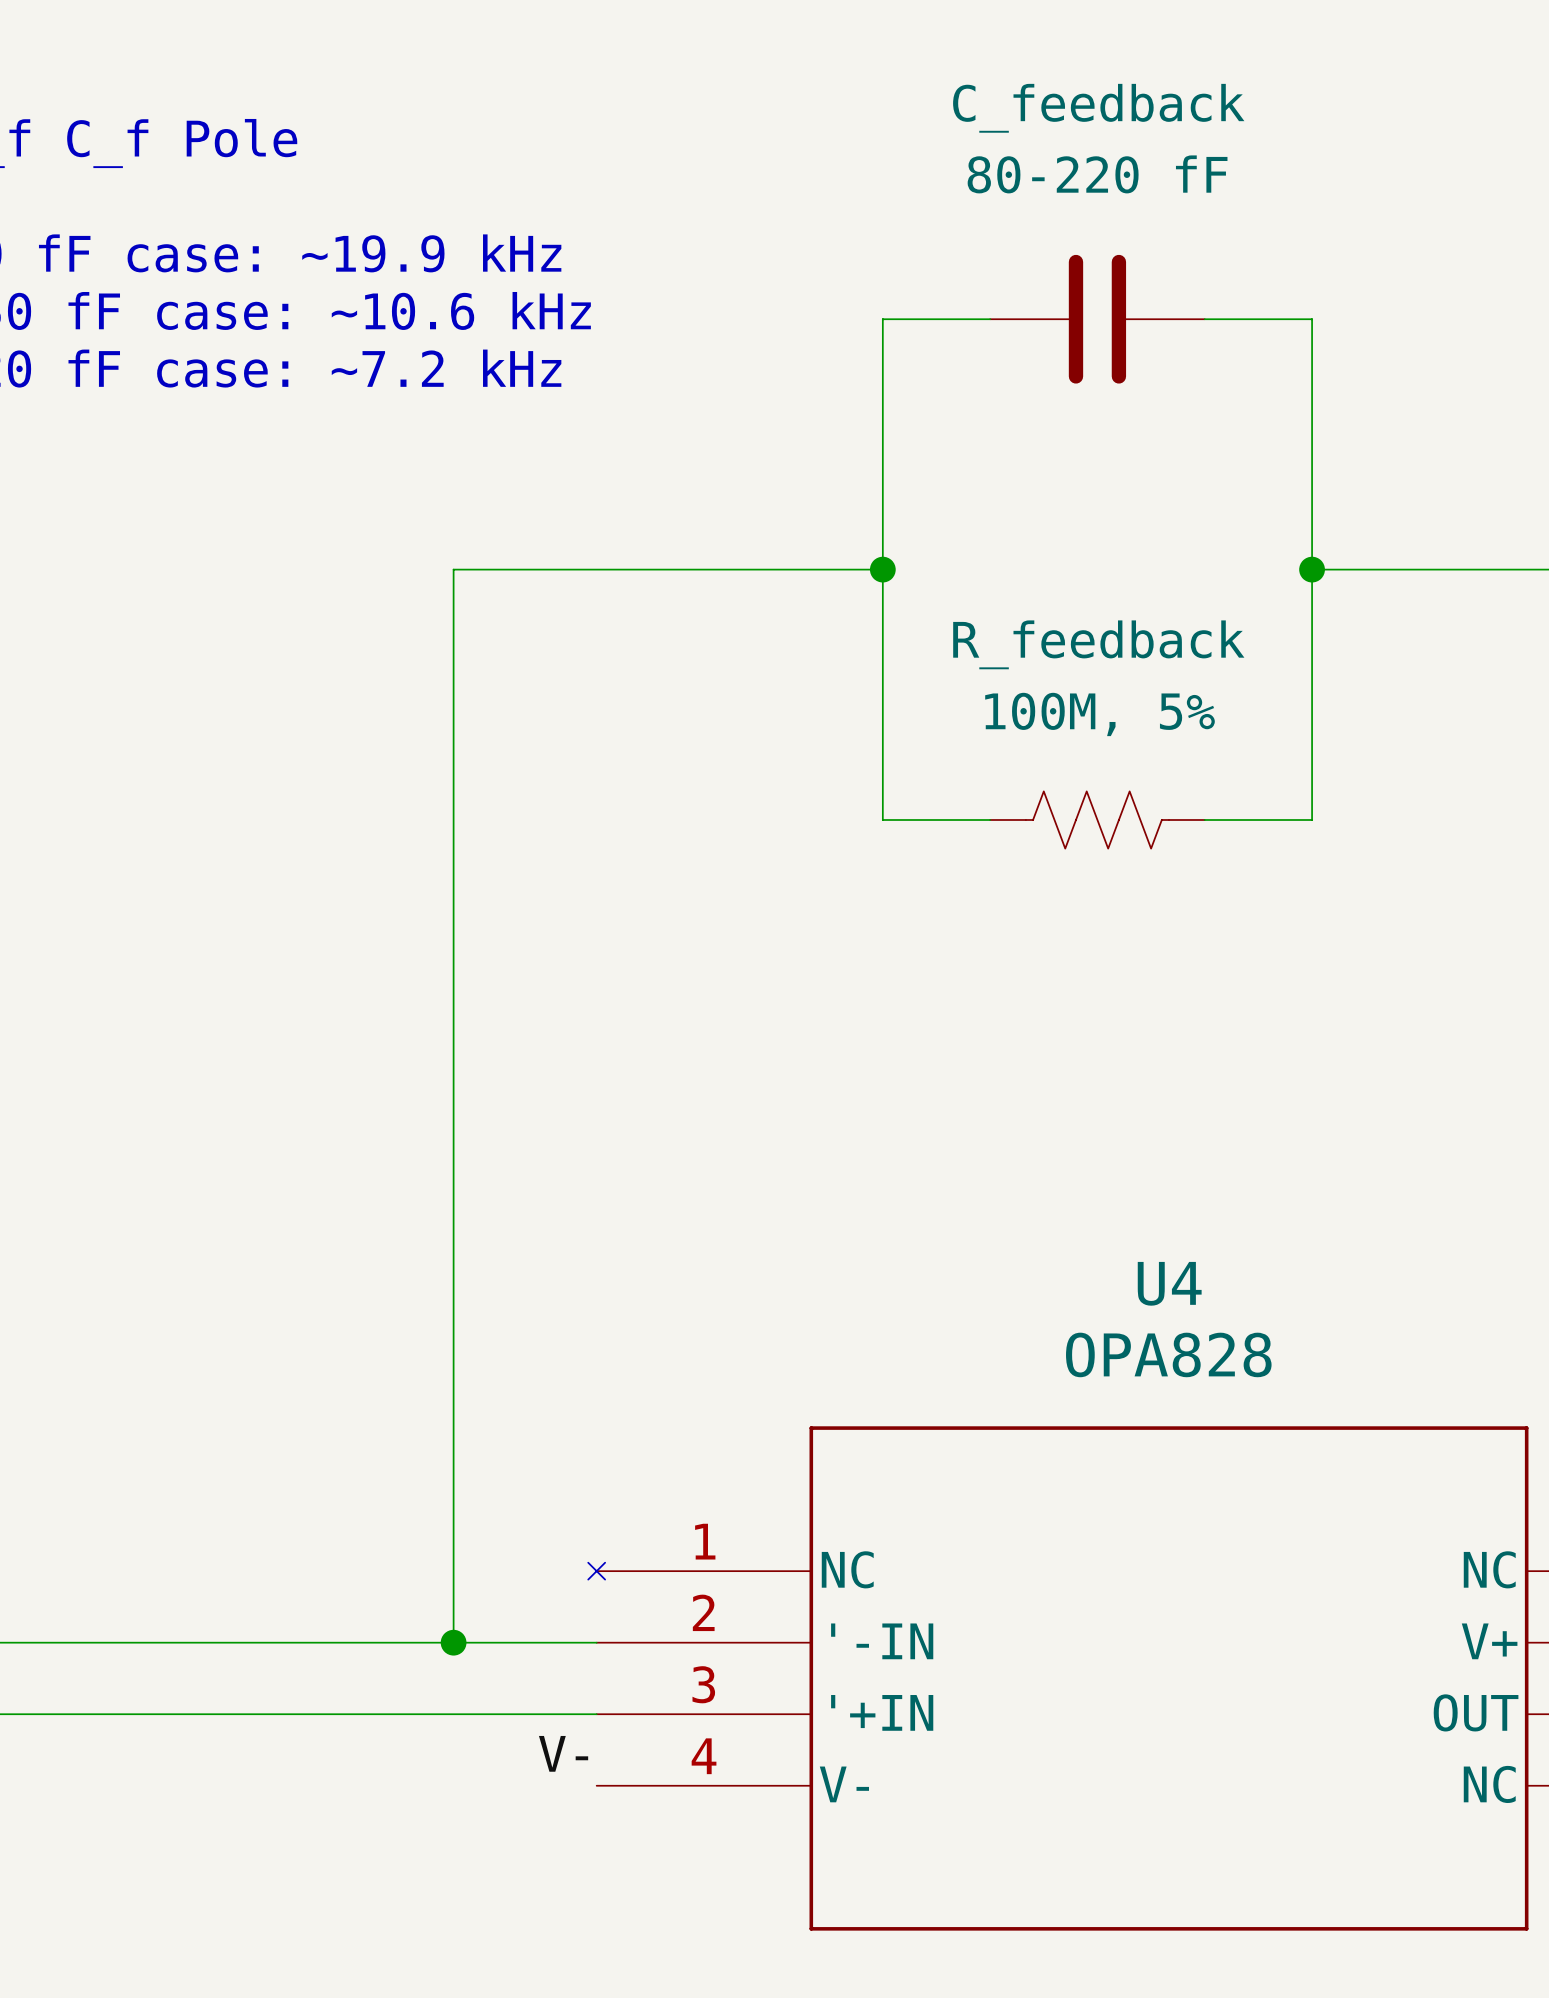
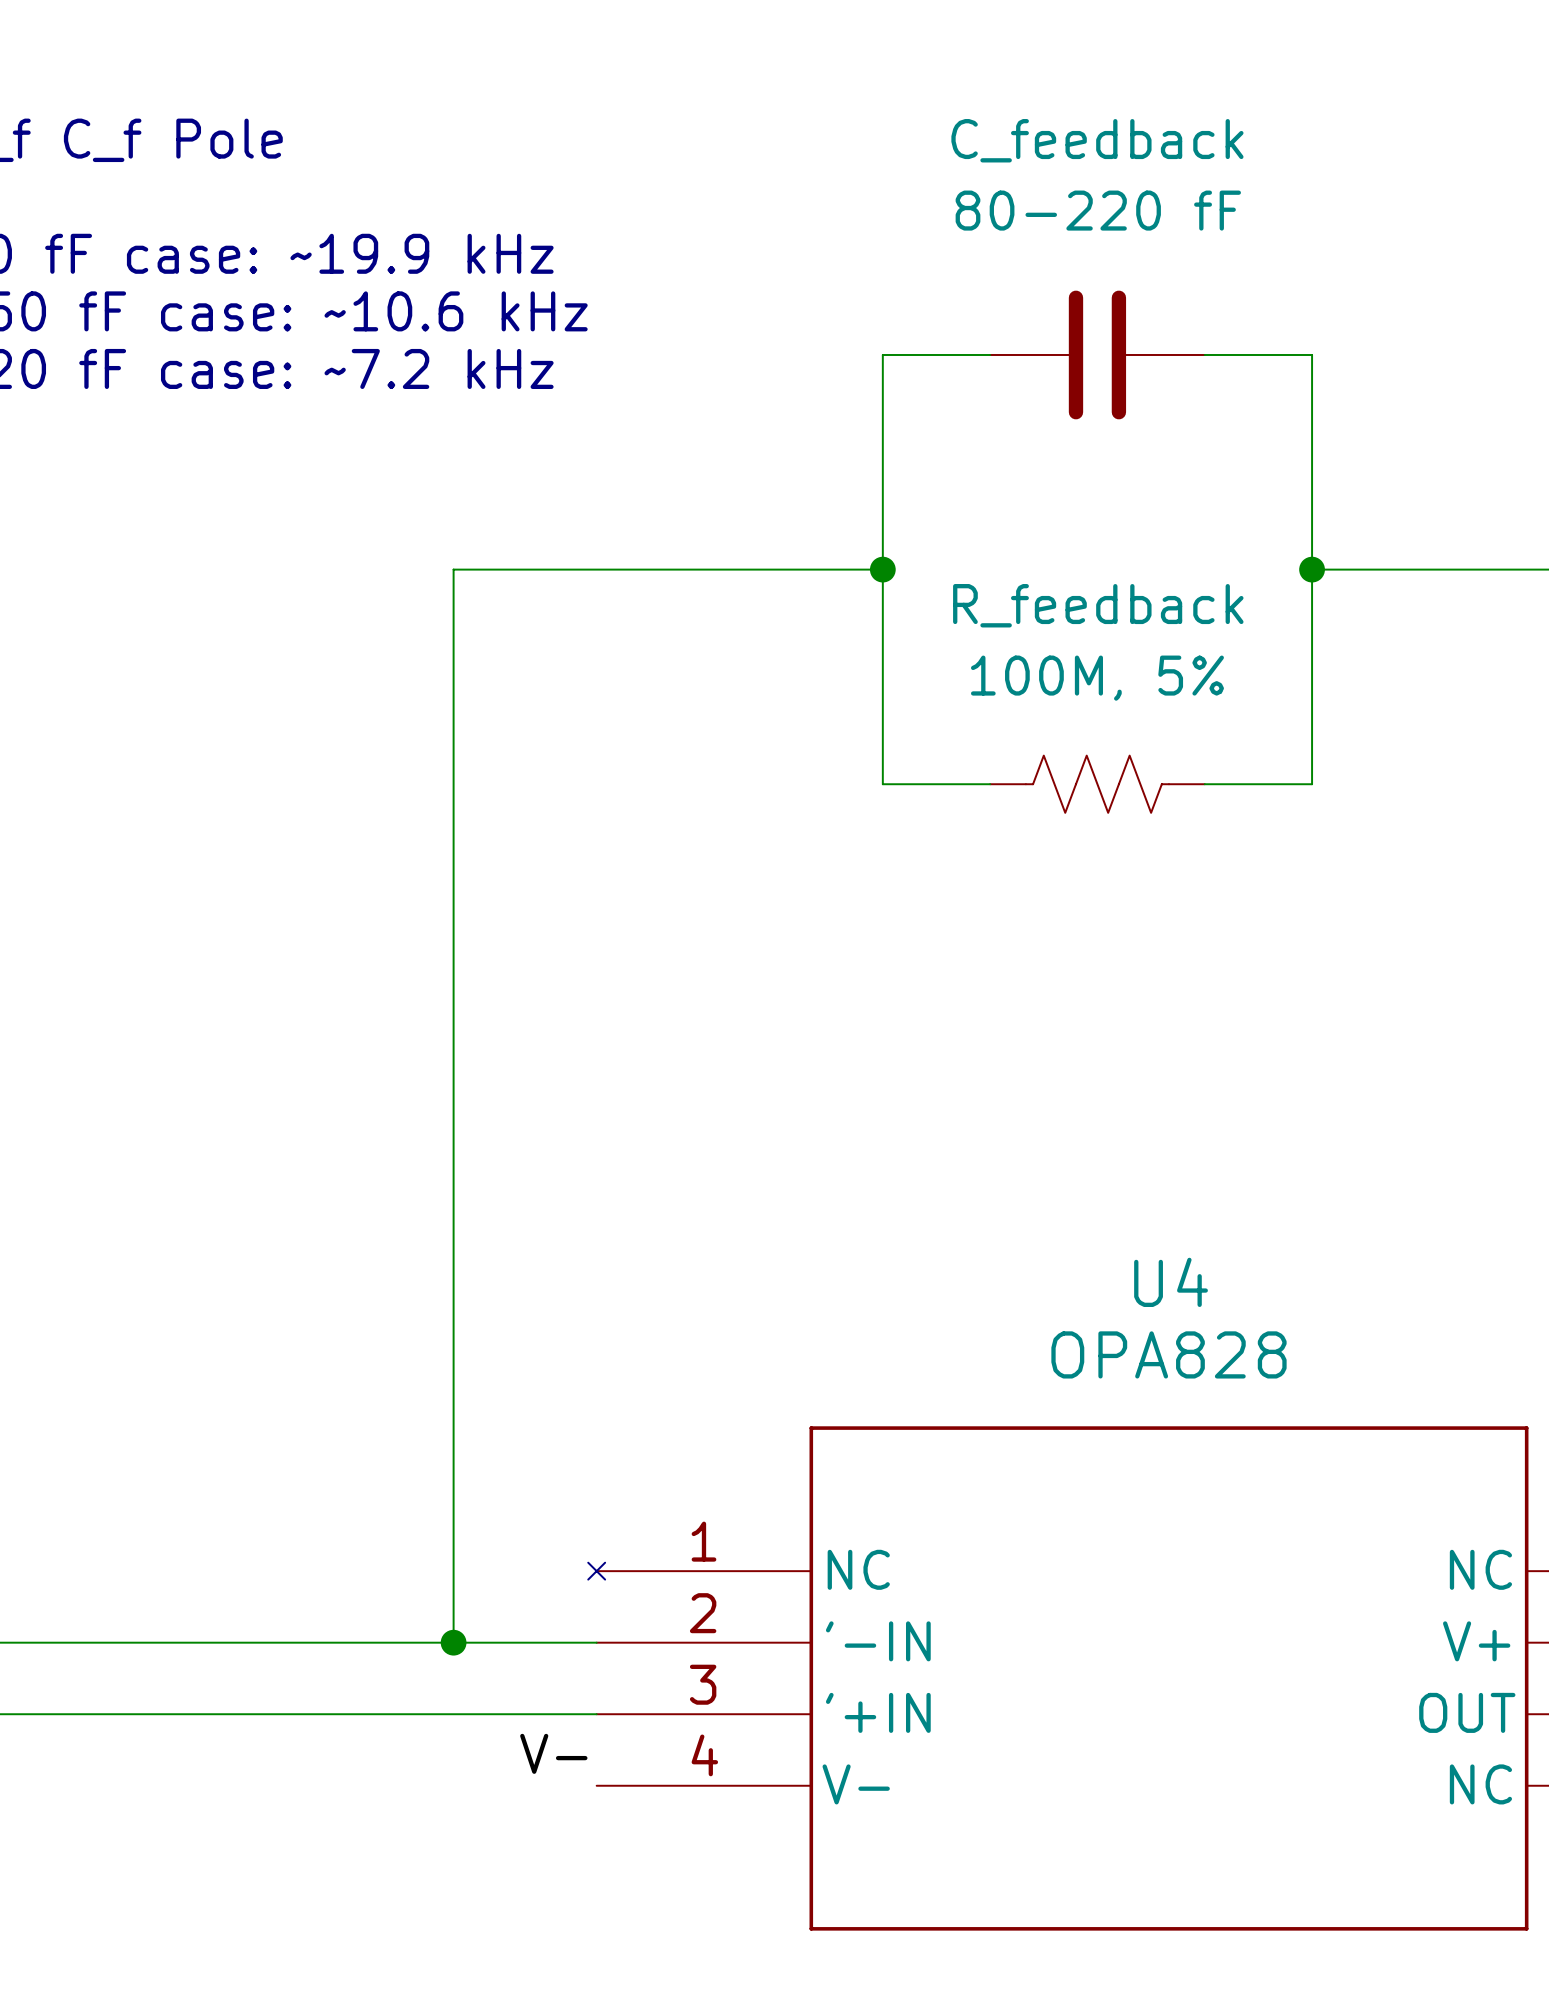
wire: (990, 319) (882, 319) (882, 354) -> (990, 354) (882, 354)
C_feedback position: (1097, 319) -> (1097, 354)
wire: (1204, 319) (1312, 319) (1312, 354) -> (1204, 354) (1312, 354)
wire: (882, 784) (882, 819) (990, 819) -> (882, 784) (990, 784)
wire: (1312, 784) (1312, 819) (1204, 819) -> (1312, 784) (1204, 784)
R_feedback position: (1097, 819) -> (1097, 784)

